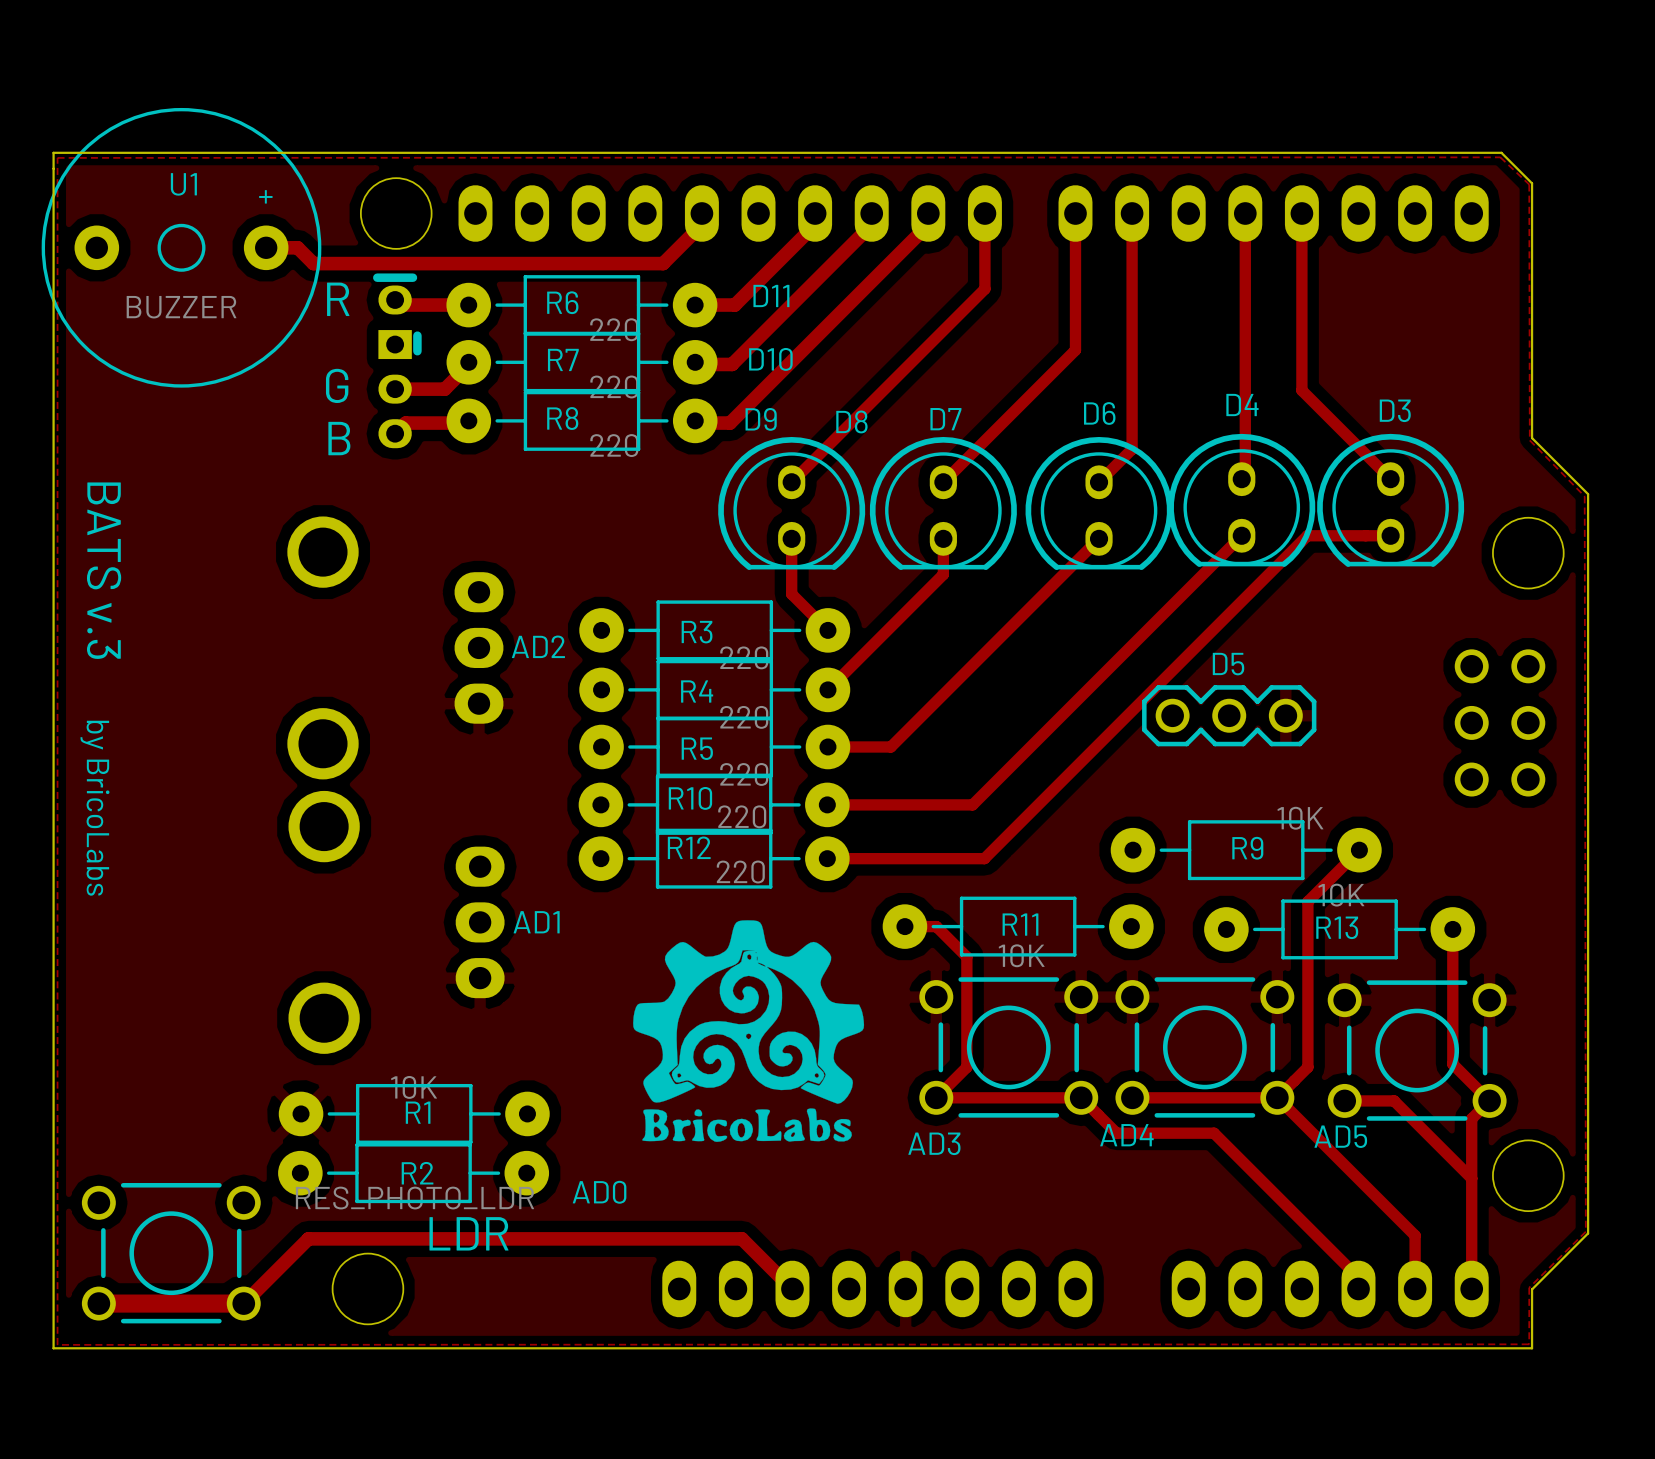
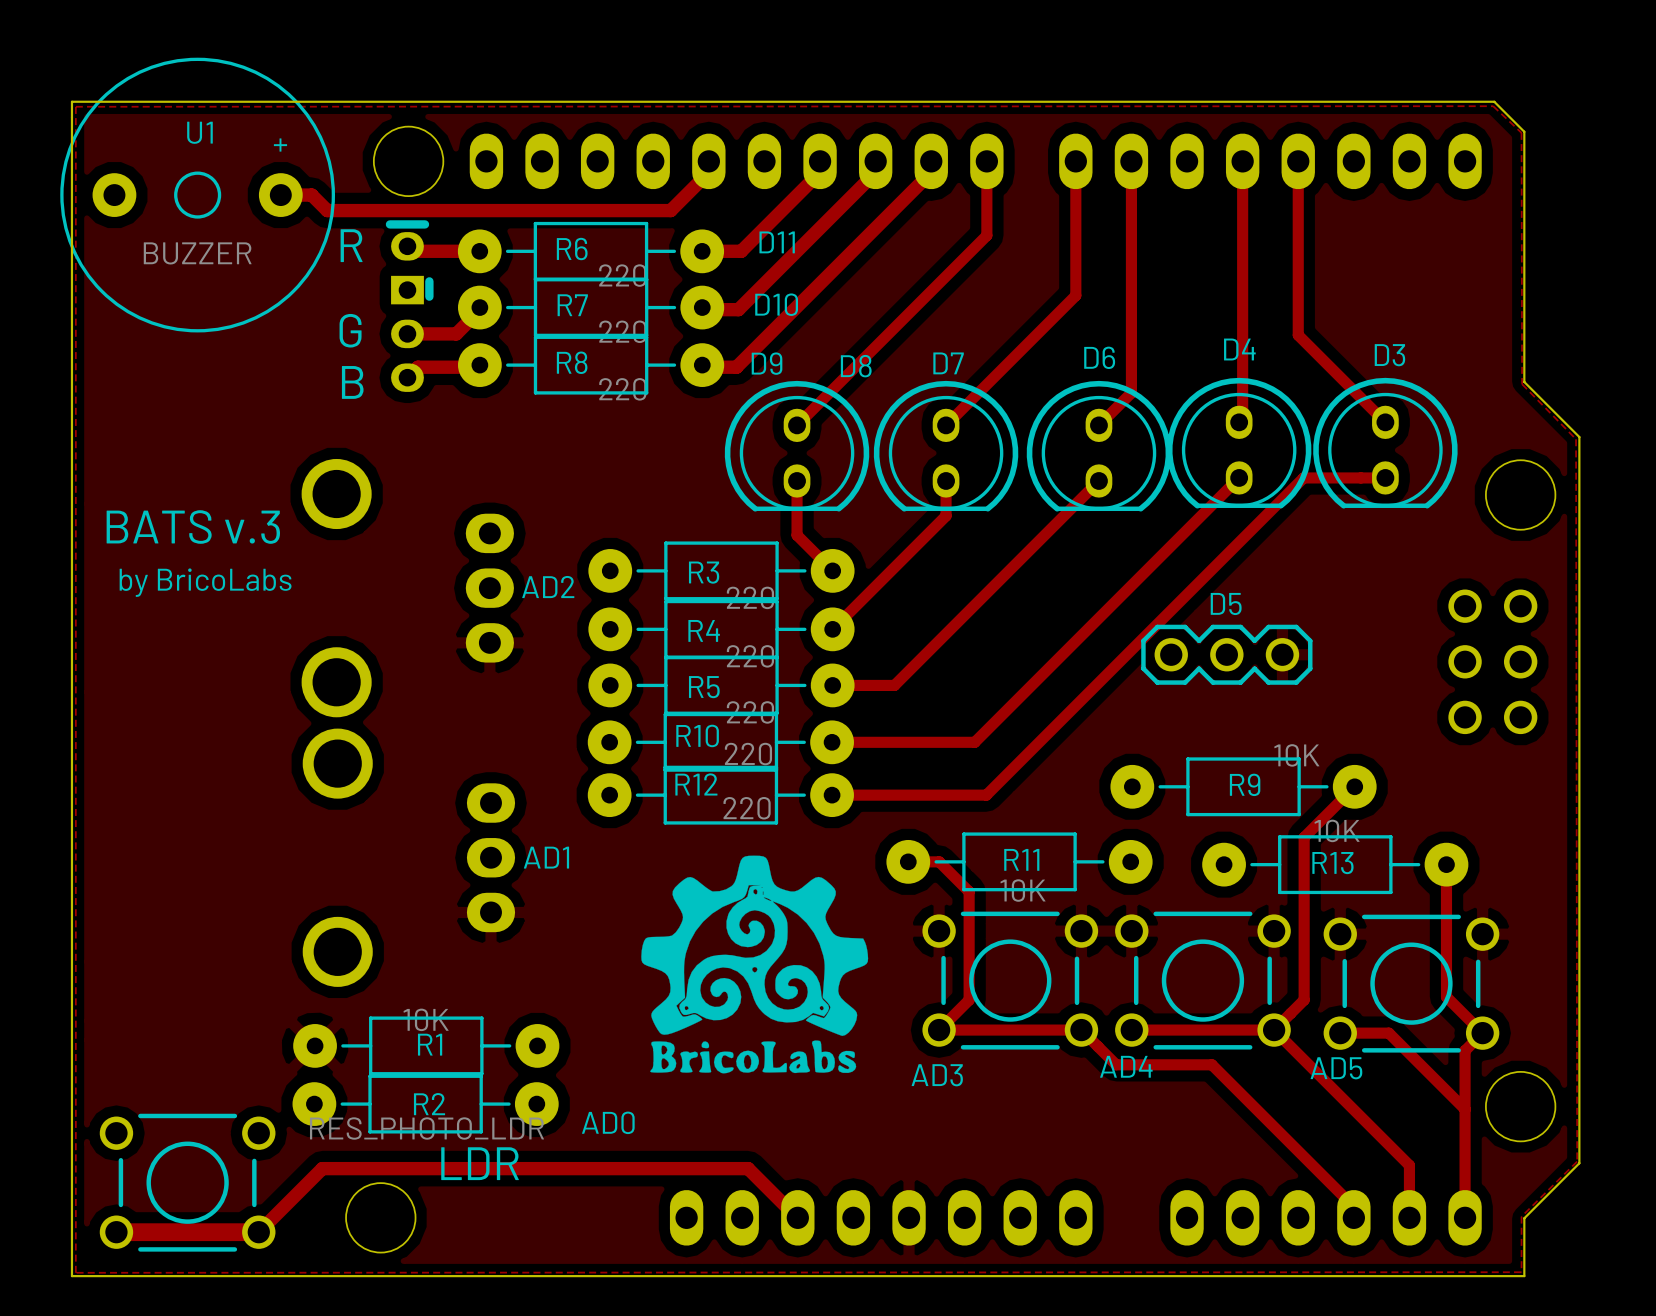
text rotation: 0° (104, 570) -> 90° counterclockwise (193, 527)
text rotation: 0° (94, 808) -> 90° counterclockwise (205, 582)

